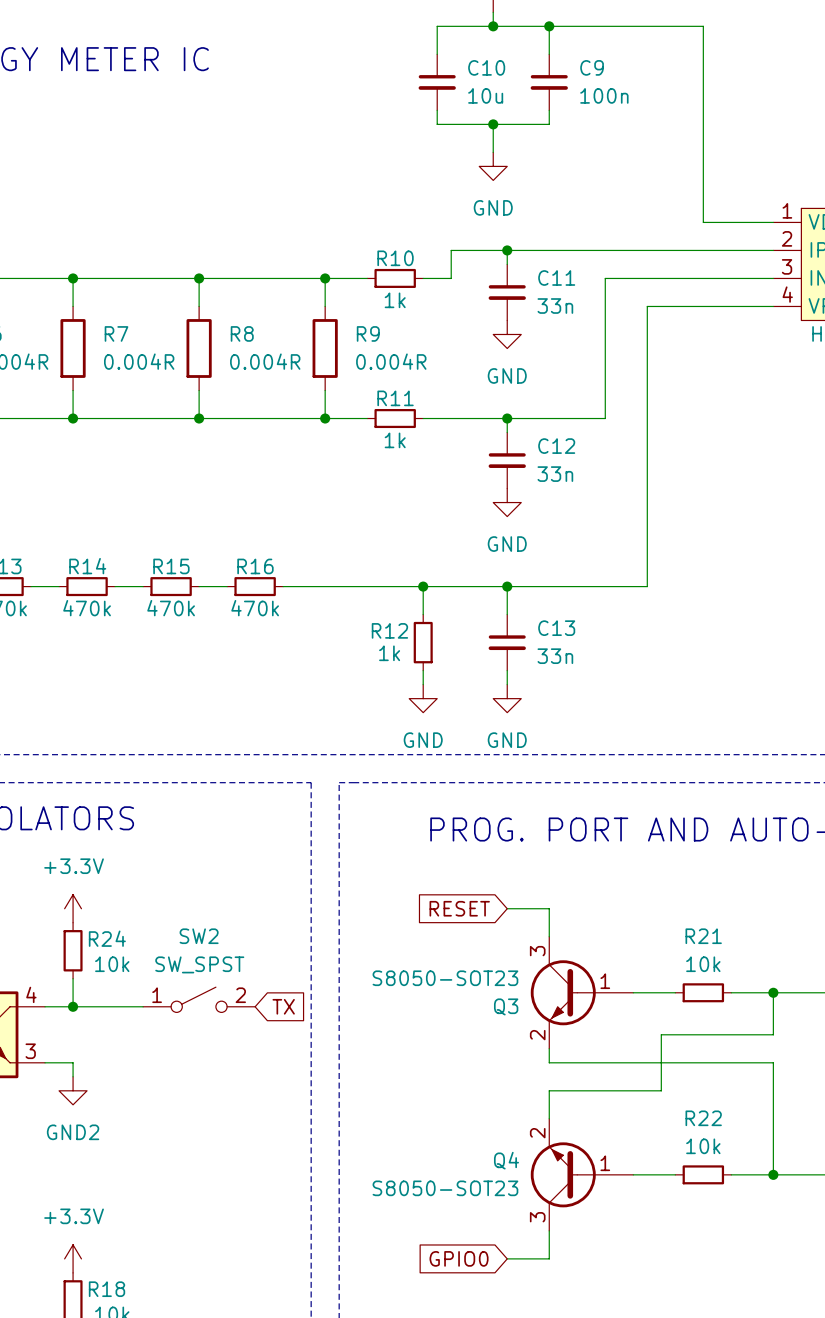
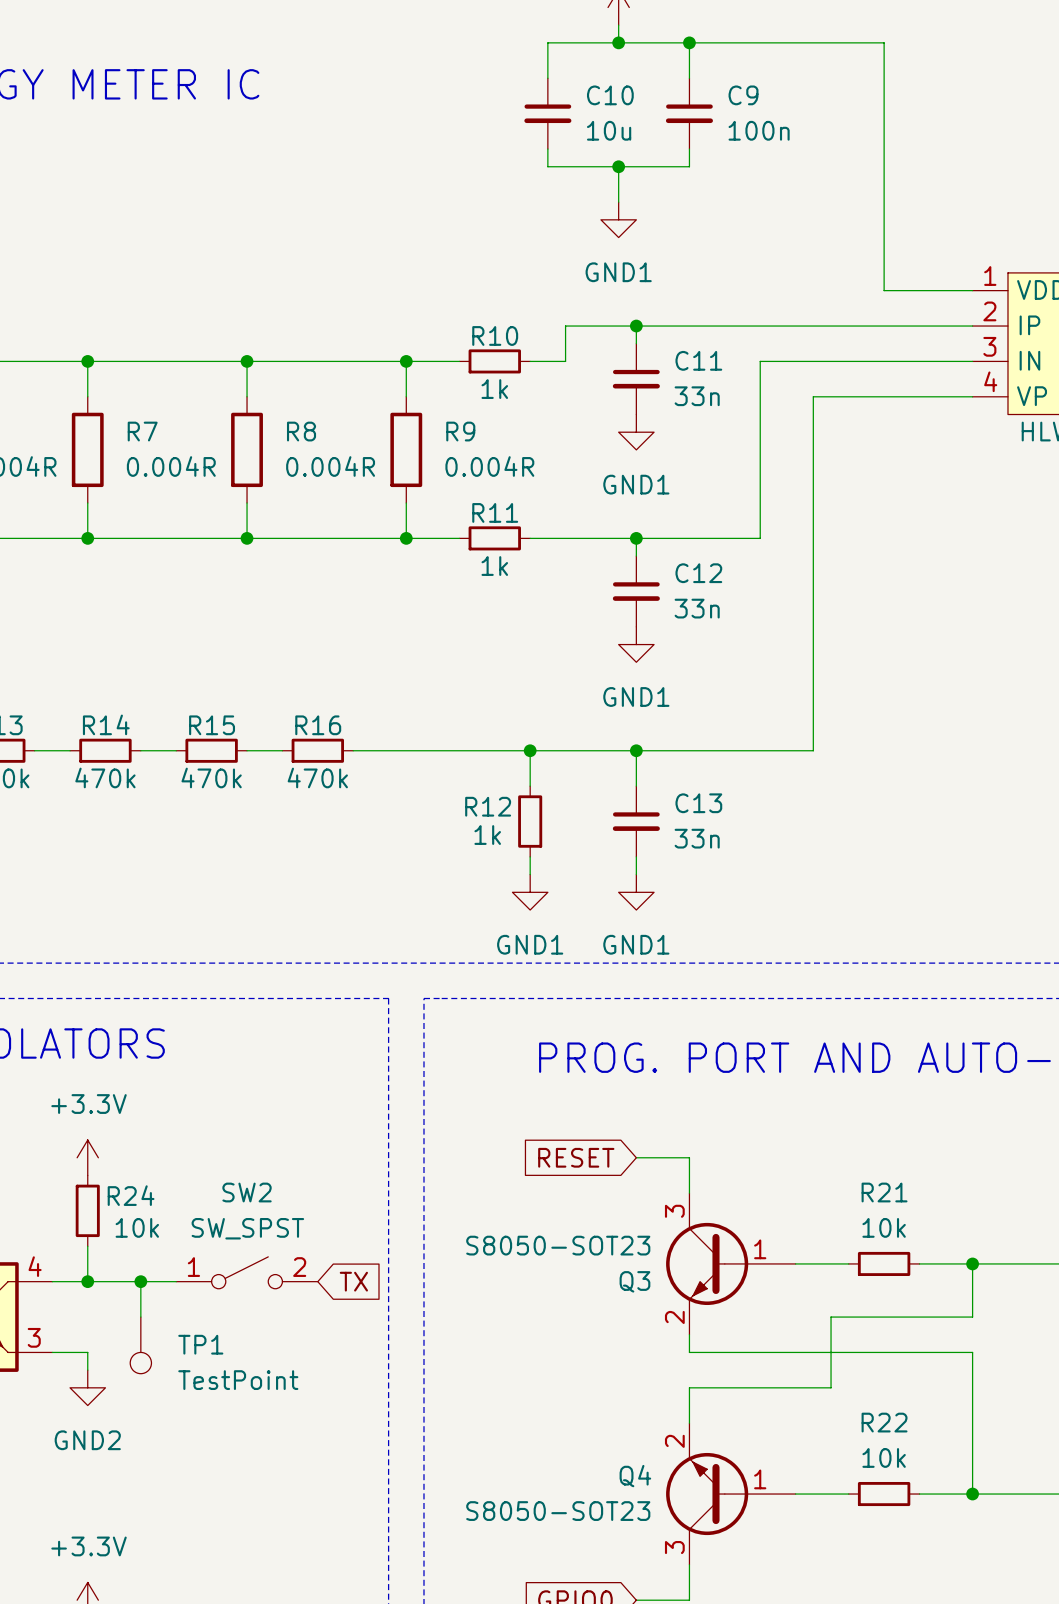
power symbol: GND (493, 166) -> GND1 (618, 219)
power symbol: GND (507, 334) -> GND1 (636, 432)
power symbol: GND (507, 502) -> GND1 (636, 644)
power symbol: GND (423, 698) -> GND1 (530, 892)
power symbol: GND (507, 698) -> GND1 (636, 892)
wire: none -> (140, 1281) (140, 1317)
junction: none -> (140, 1281)
TP1: none -> TestPoint (140, 1345)

